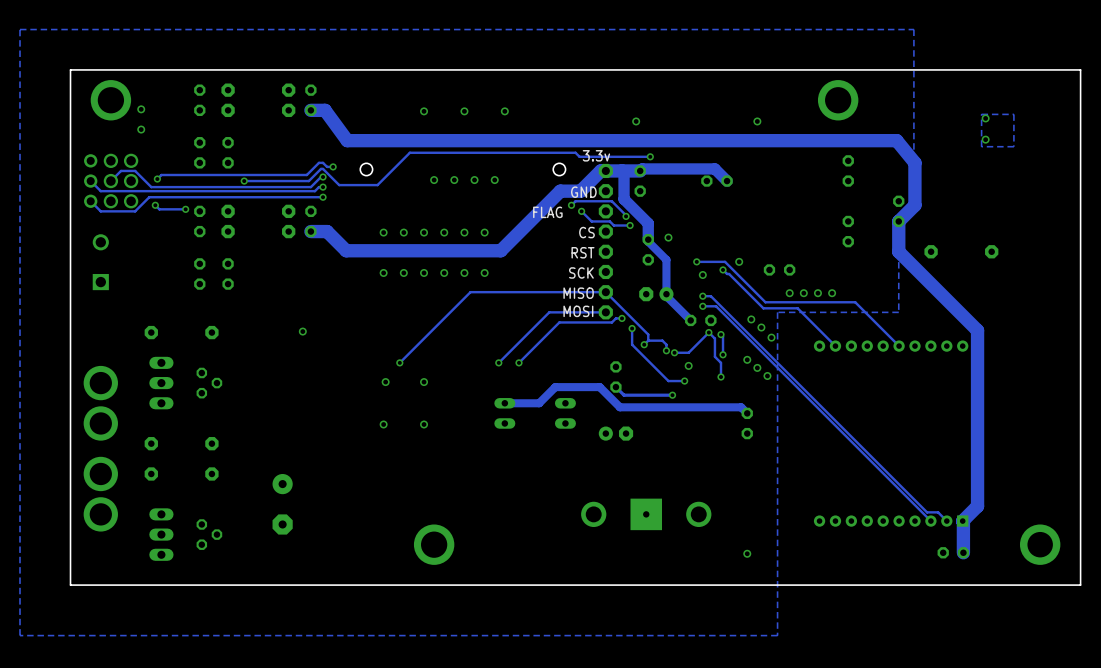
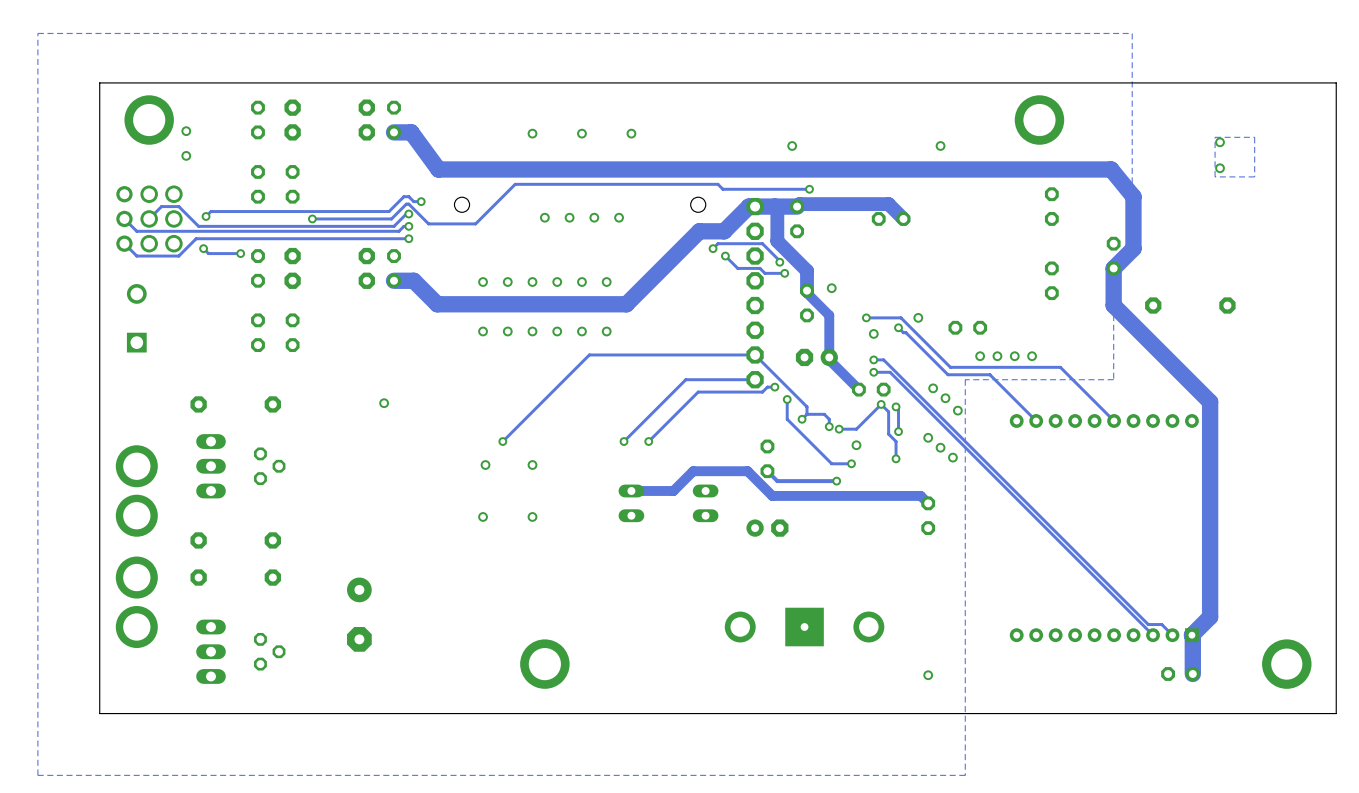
text: 3.3v (596, 155) -> none
text: GND (583, 192) -> none
text: FLAG (547, 212) -> none
text: CS (586, 232) -> none
text: RST (583, 252) -> none
text: SCK (581, 272) -> none
text: MISO (578, 293) -> none
text: MOSI (578, 311) -> none

